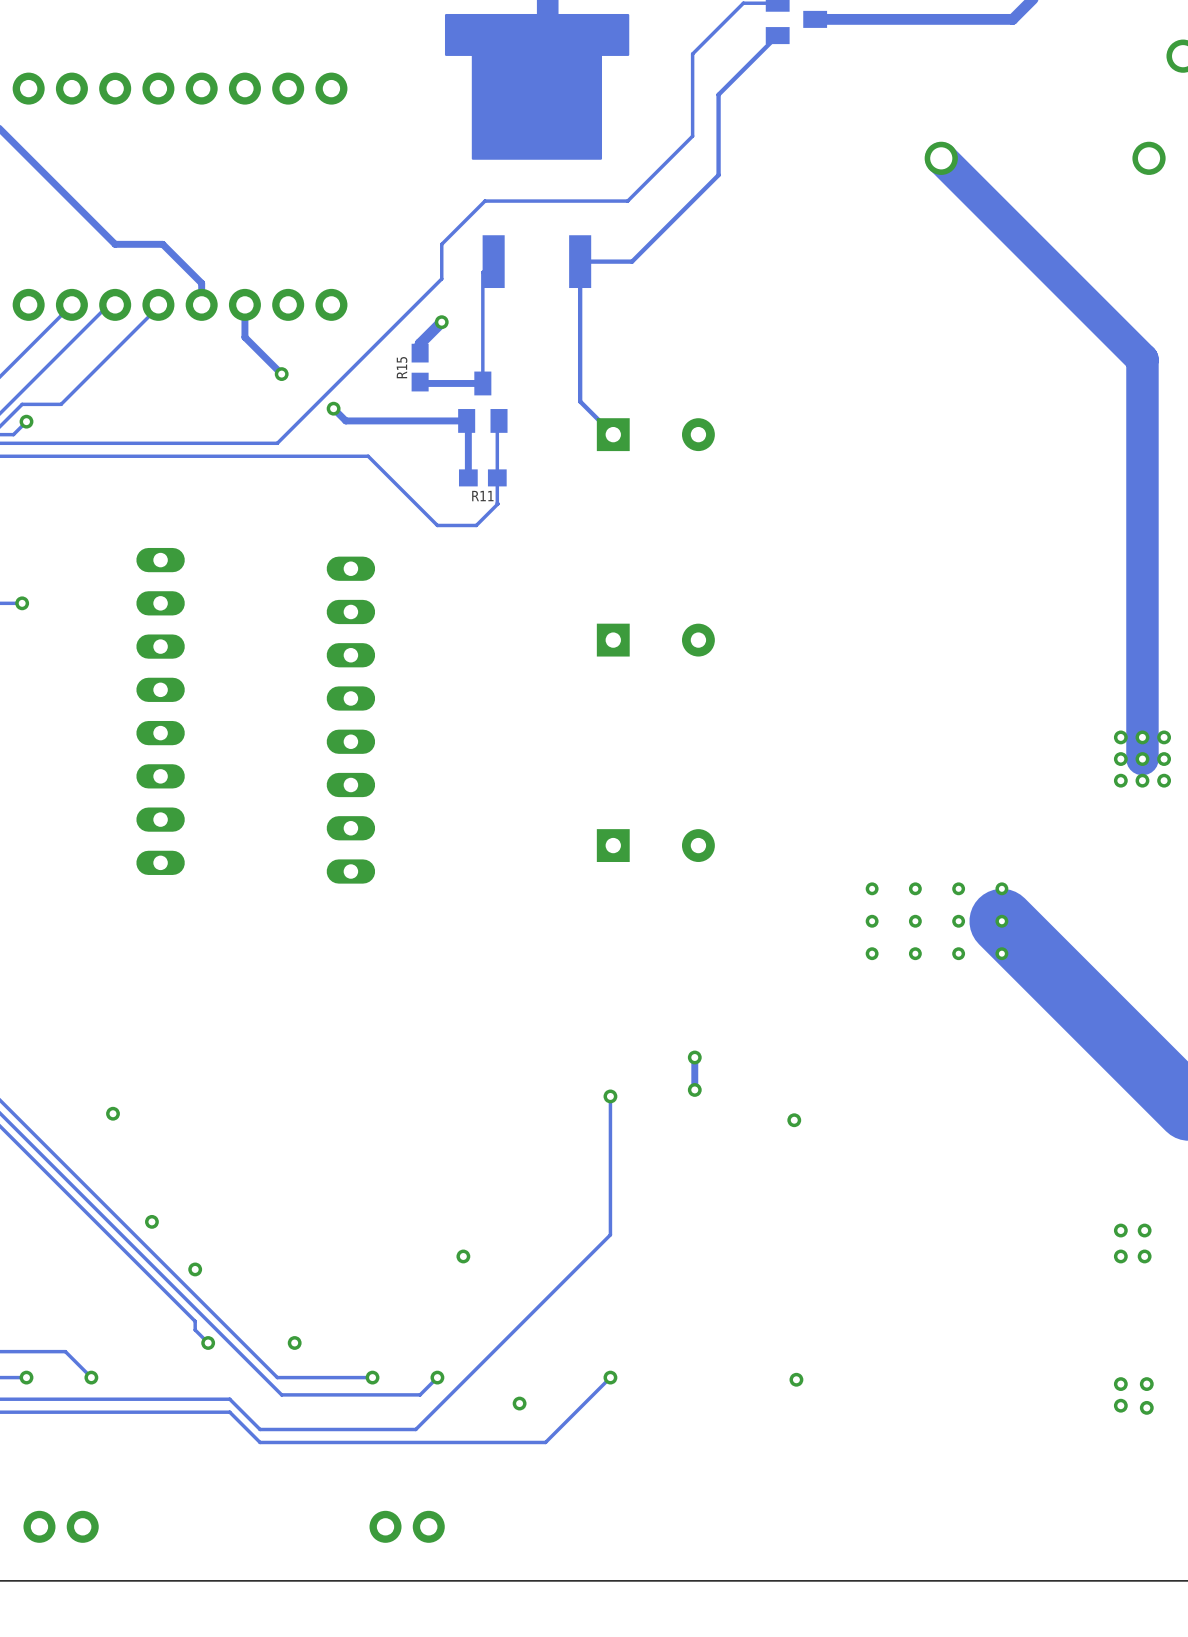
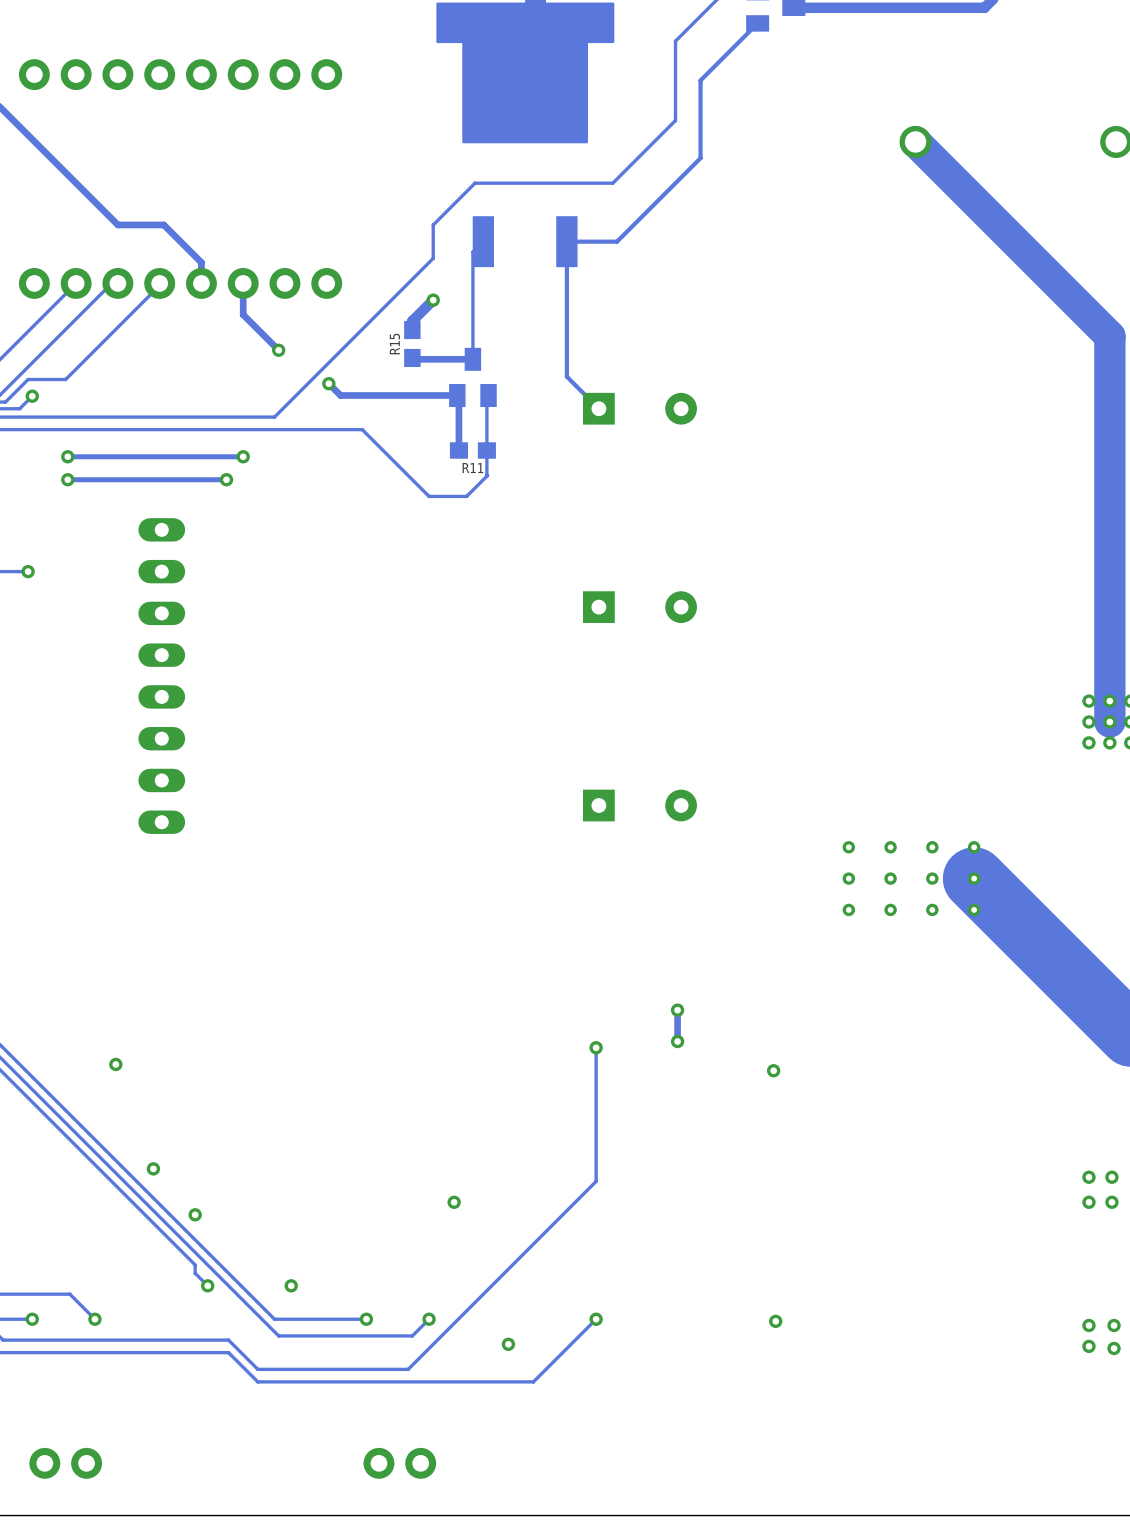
via: none -> (67, 456)
track: none -> (243, 456) (67, 456)
via: none -> (243, 456)
via: none -> (67, 479)
track: none -> (226, 479) (67, 479)
via: none -> (226, 479)
part: (350, 720) -> none

